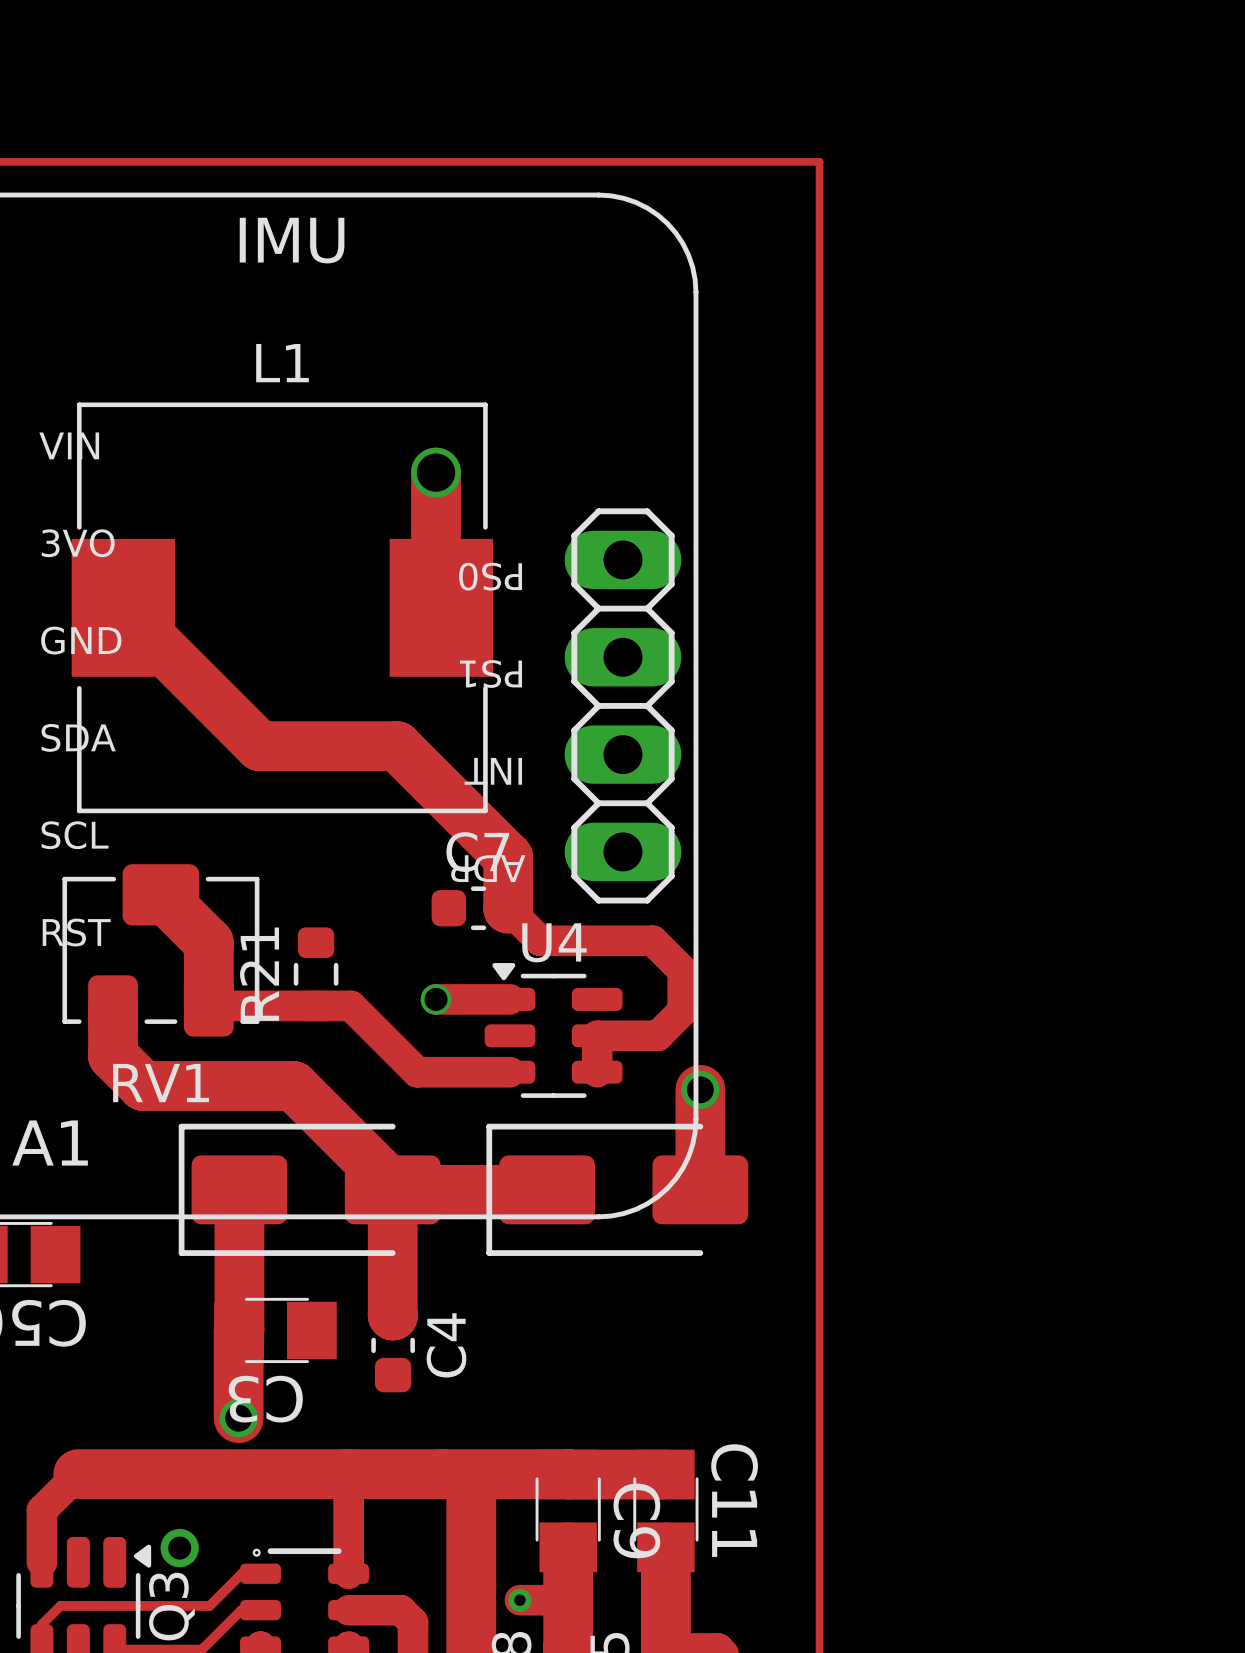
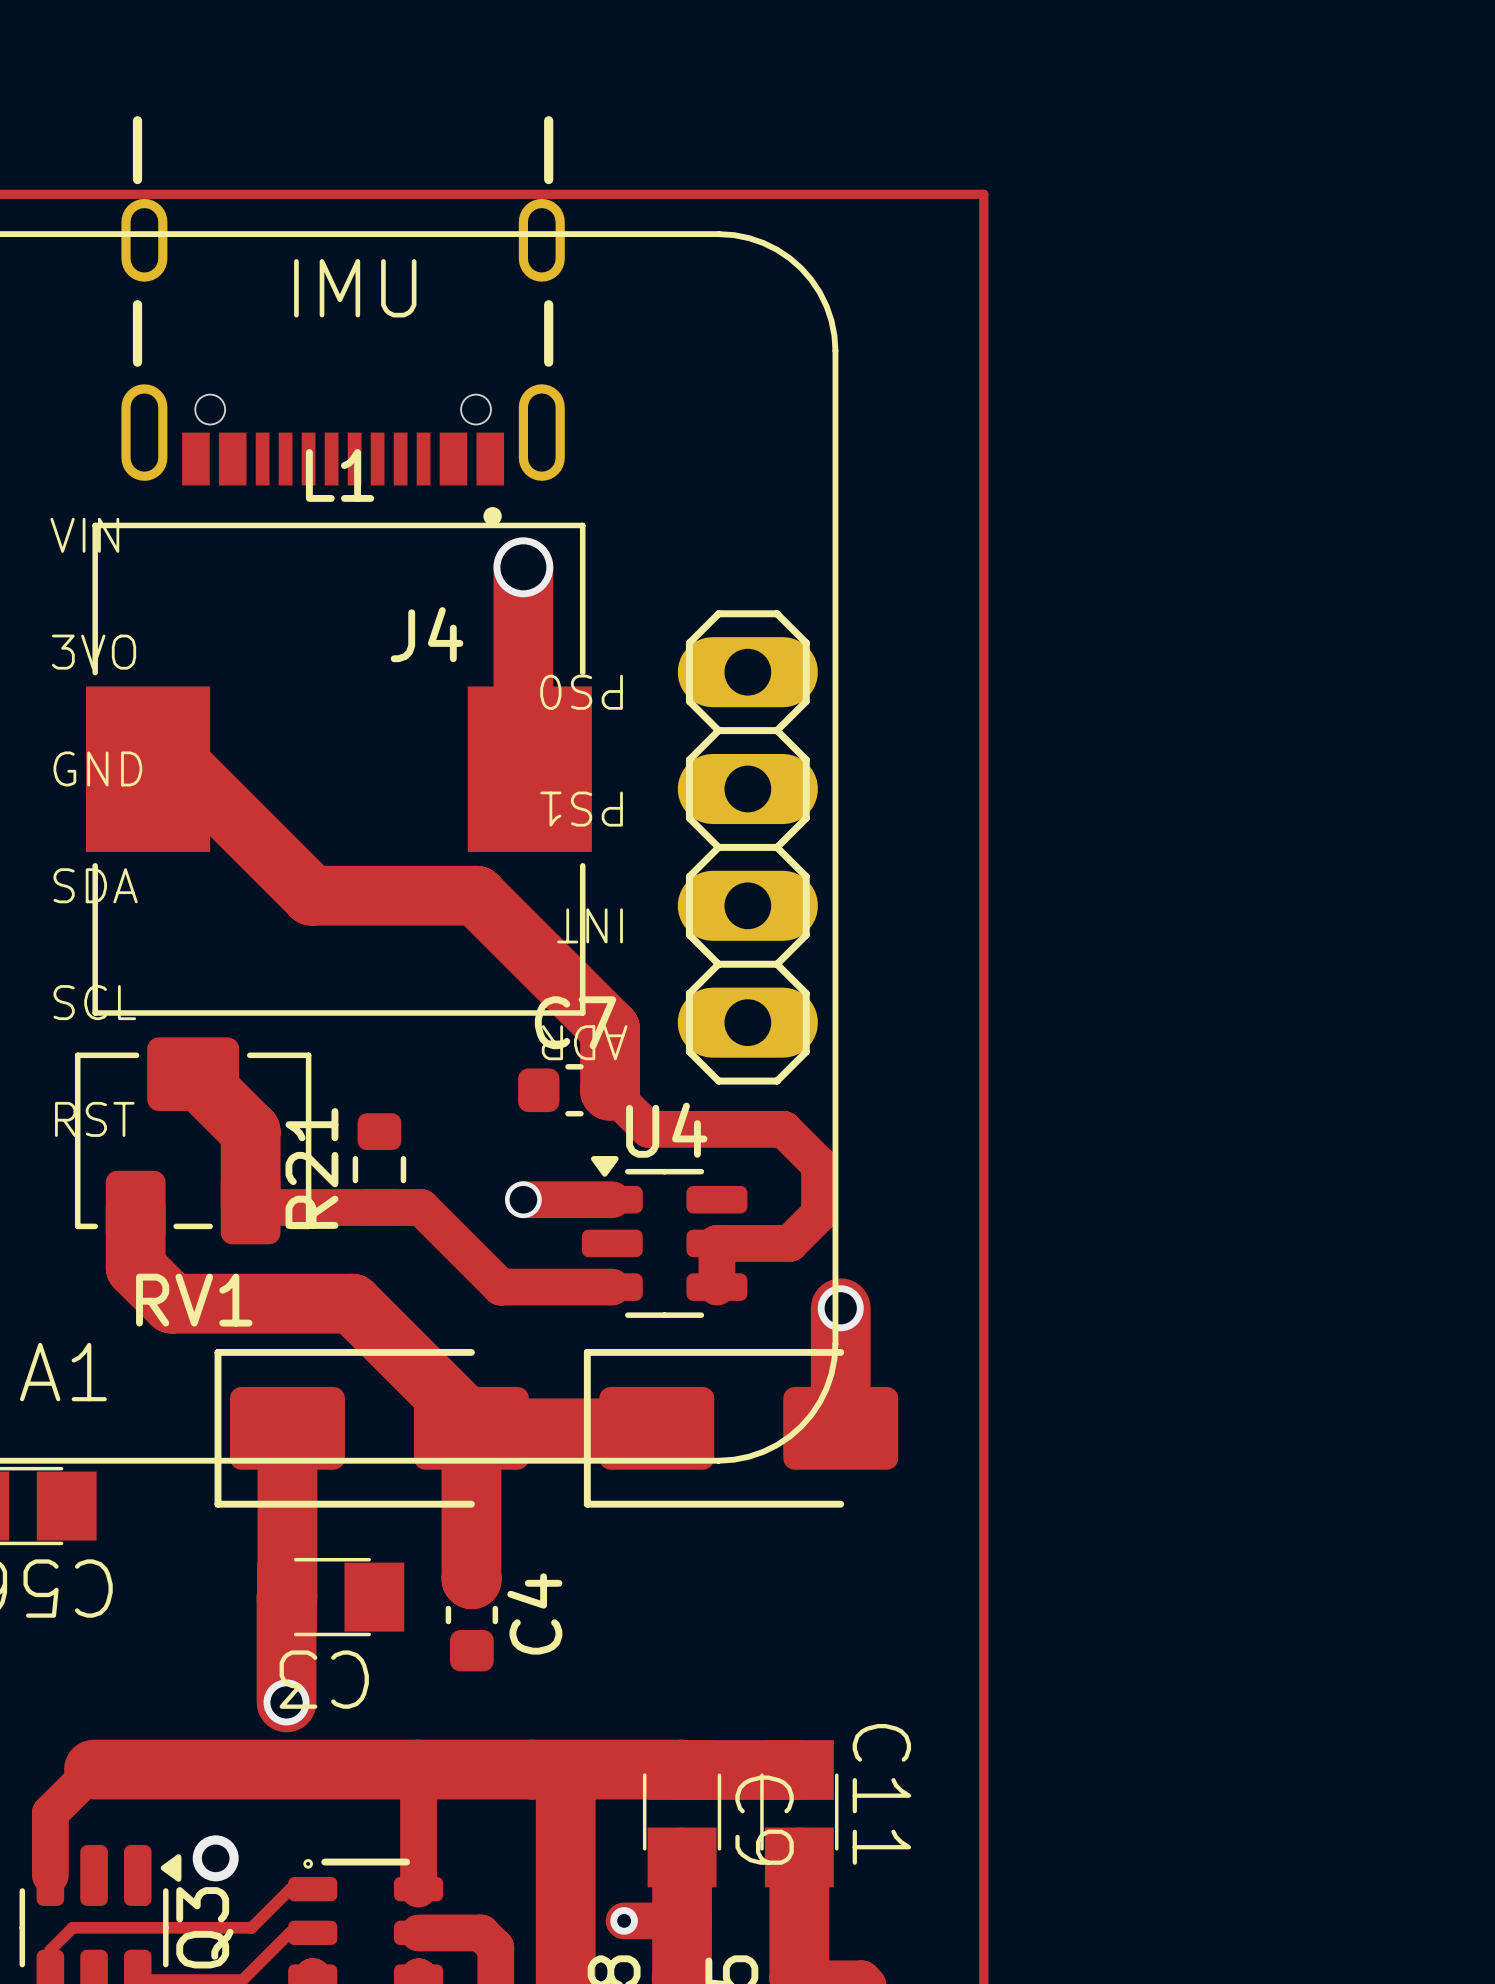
J4: none -> (343, 320)
L1 position: (282, 607) -> (338, 769)

